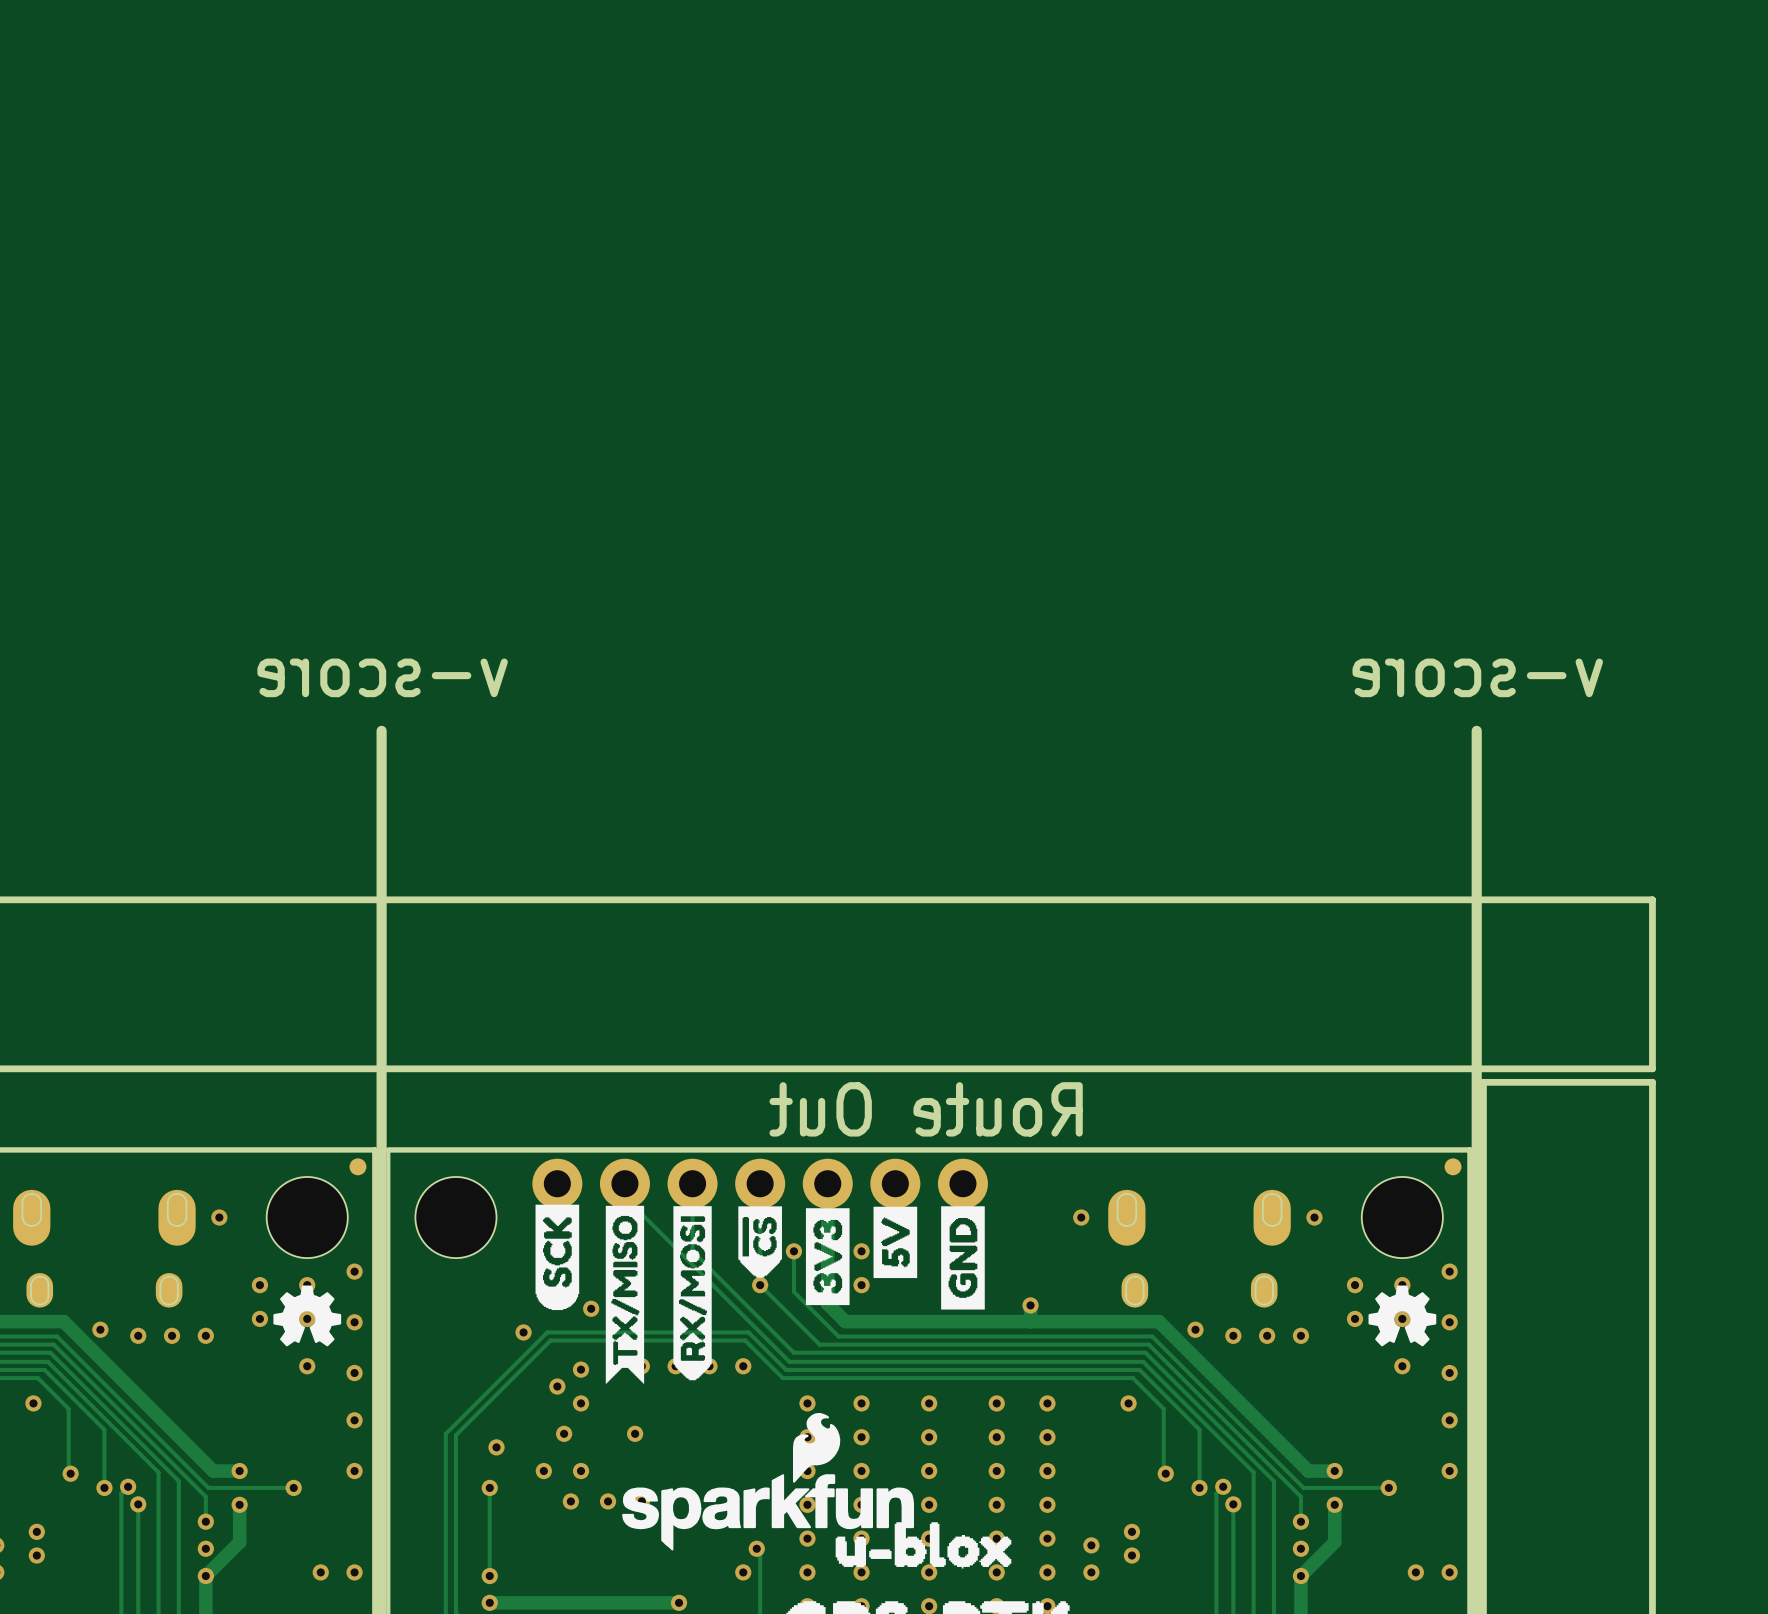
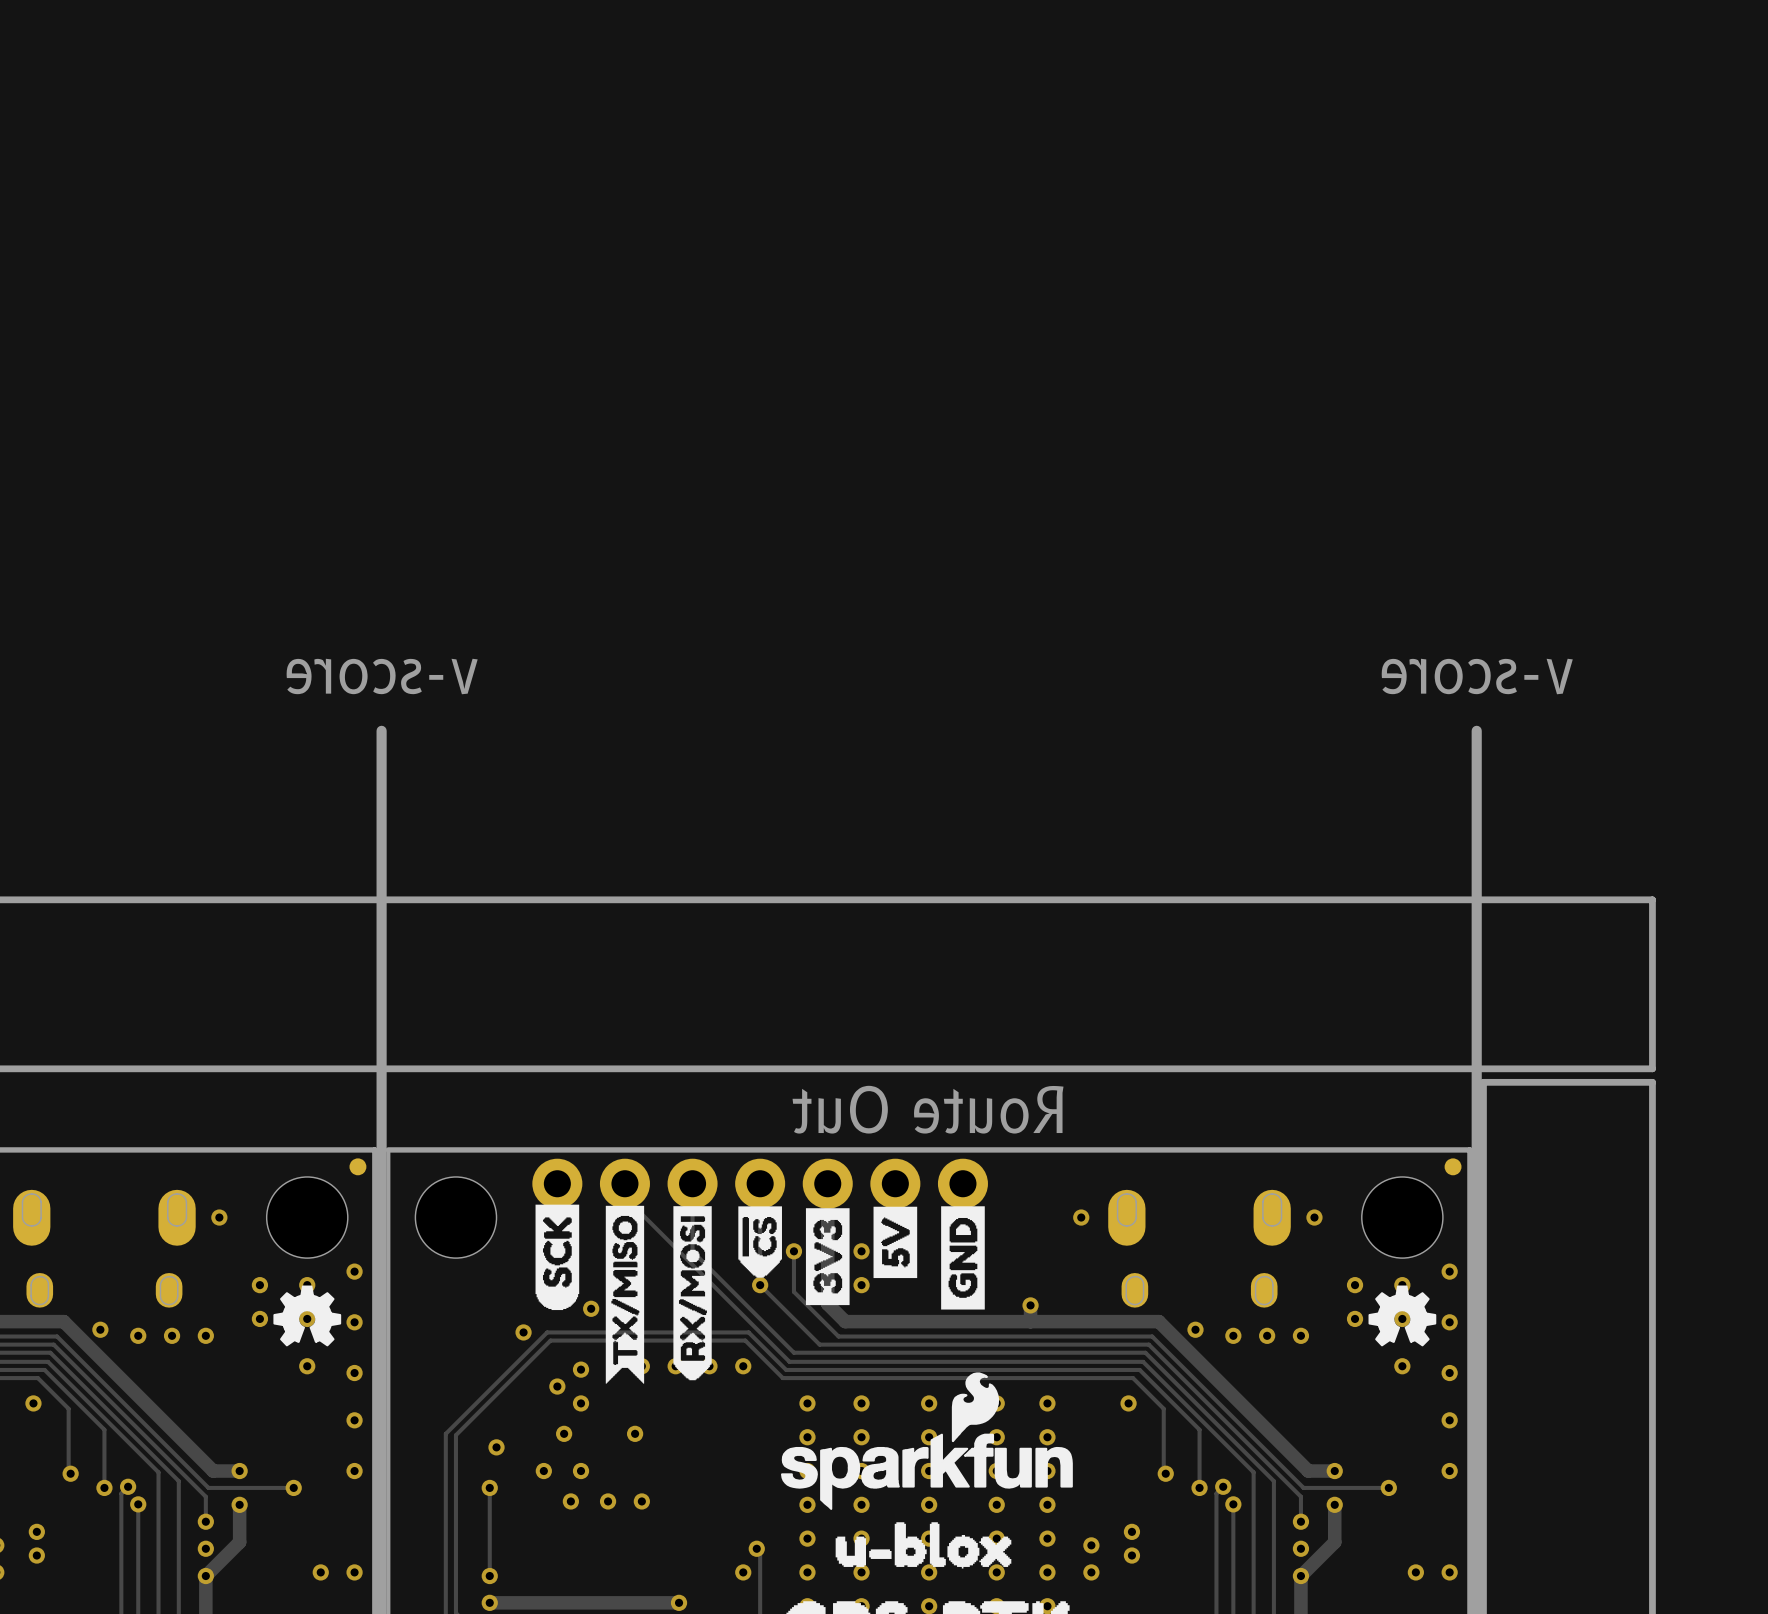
drawing: none -> [780, 1372, 1073, 1510]
drawing: [622, 1413, 914, 1551] -> none

